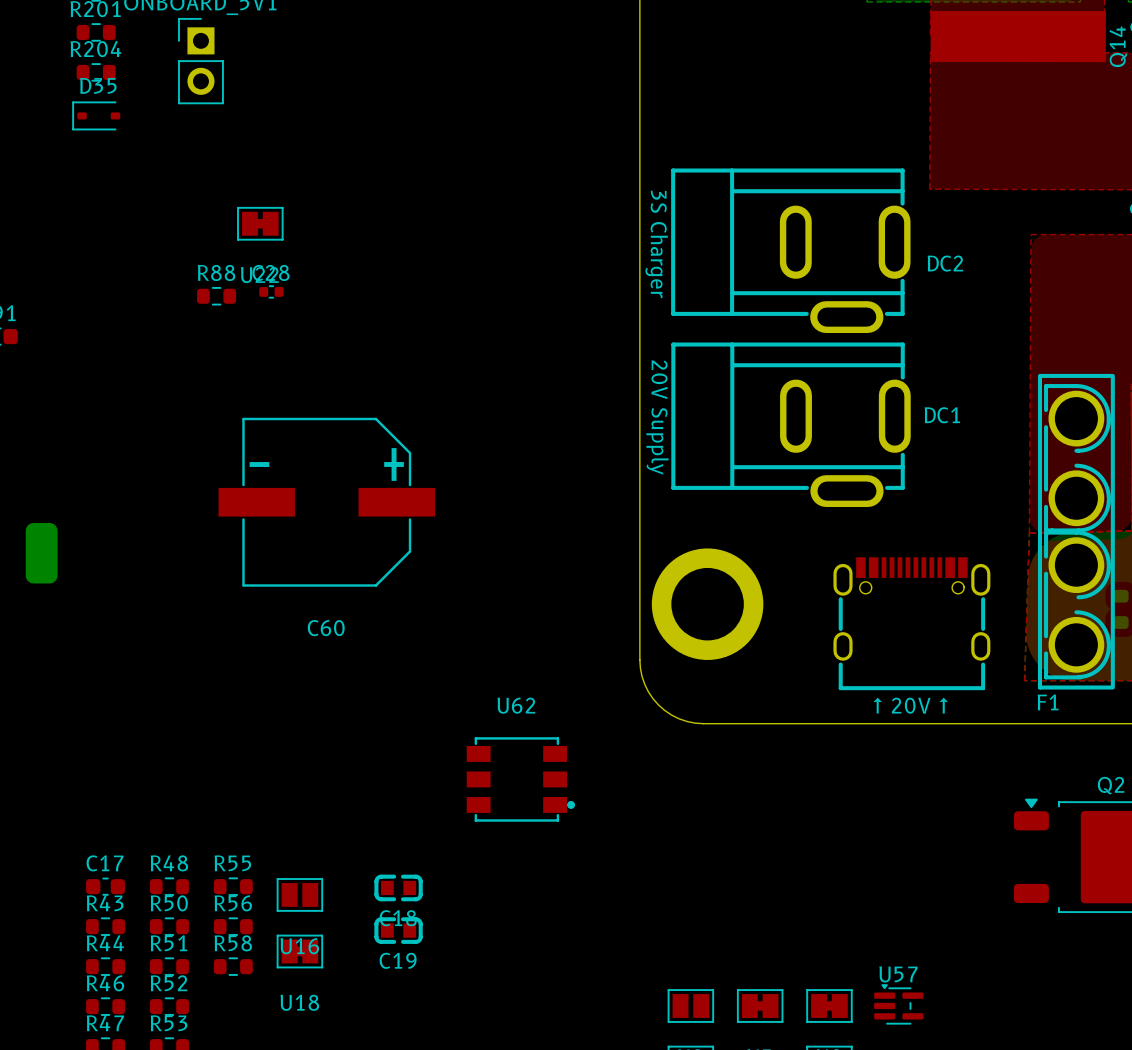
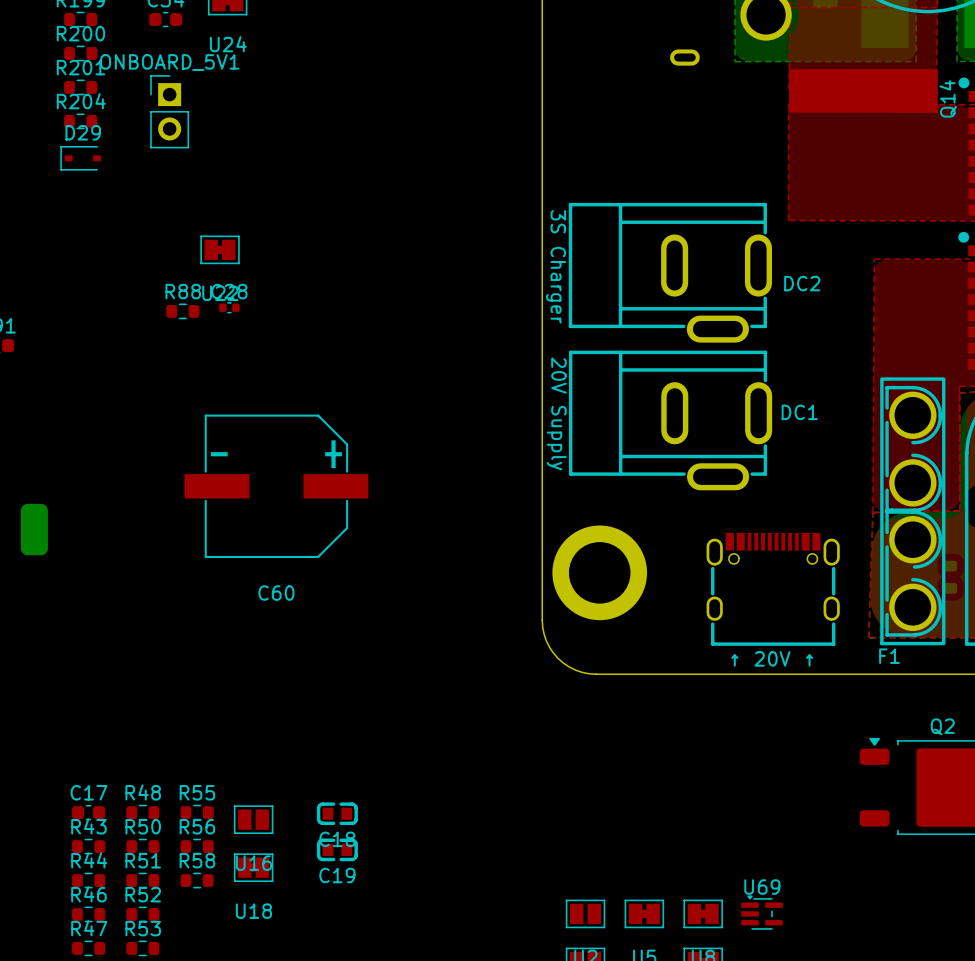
D35 name: D35 (98, 85) -> D29 (83, 132)
U62: (520, 779) -> none
U57 name: U57 (898, 974) -> U69 (762, 887)

